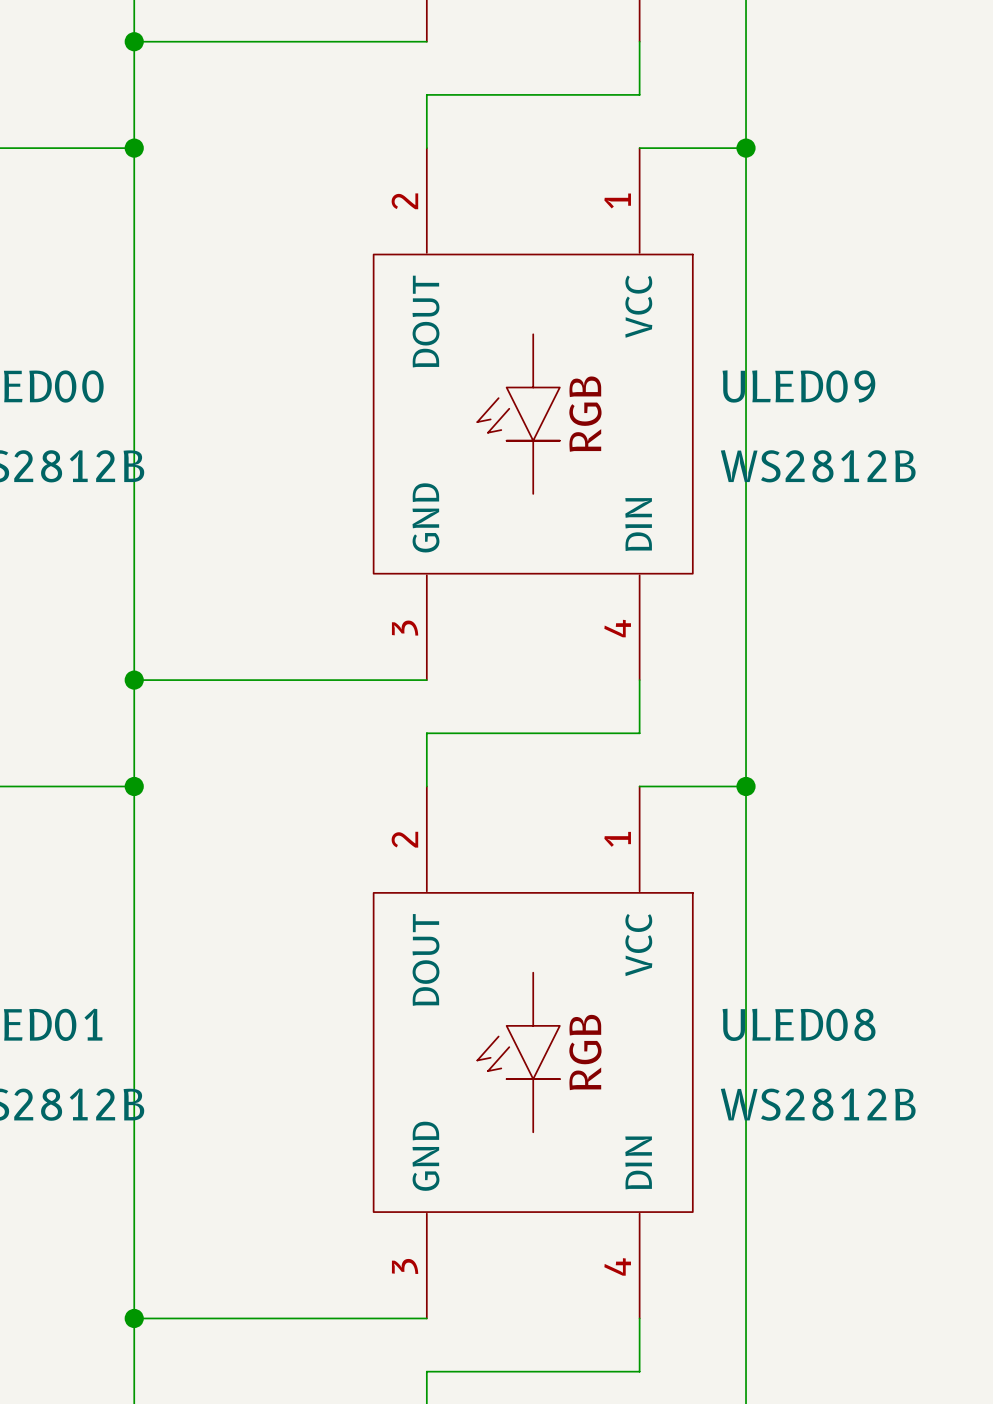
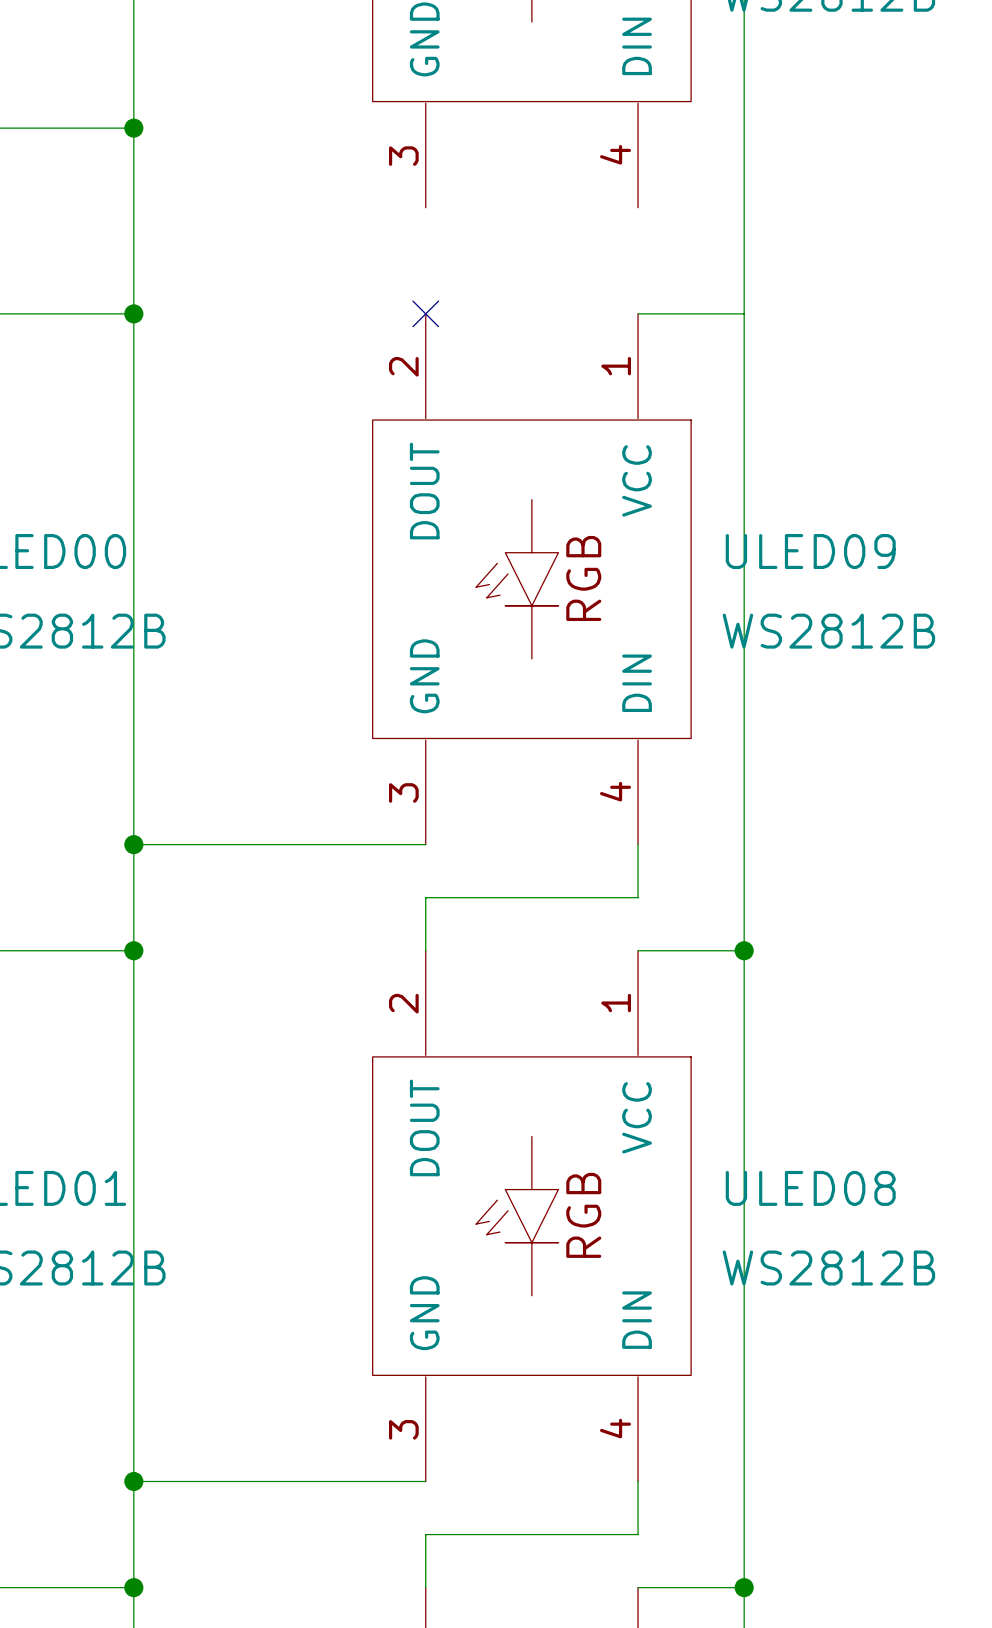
wire: (134, 41) (426, 41) -> none
junction: (134, 41) -> none
wire: (639, 41) (639, 94) (426, 94) (426, 148) -> none
no-connect mark: none -> (425, 313)
junction: (746, 148) -> none

